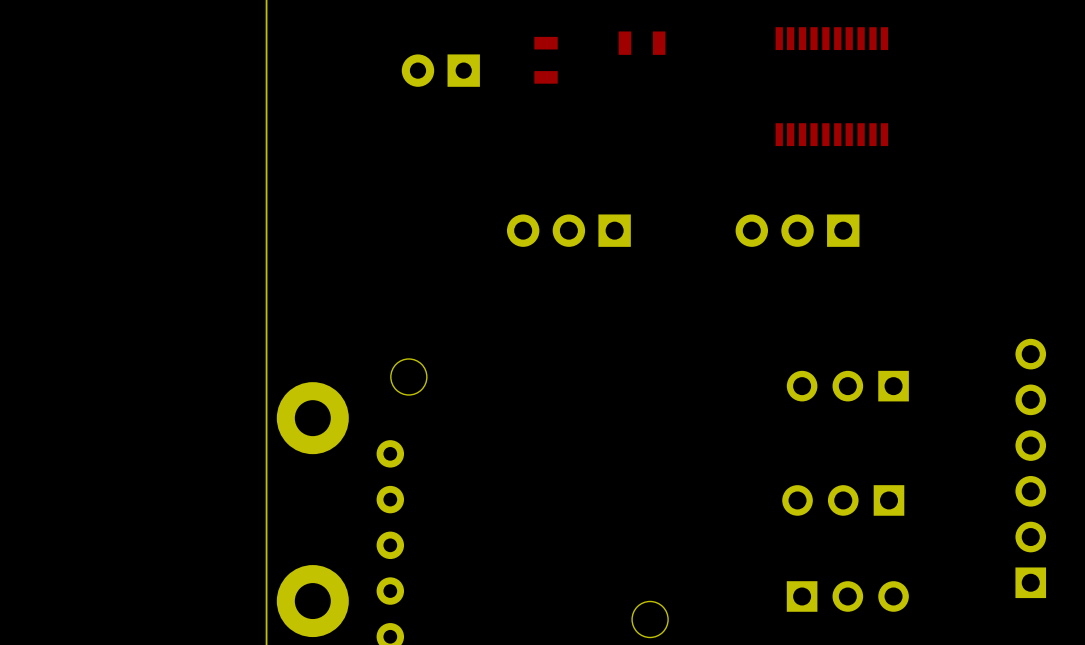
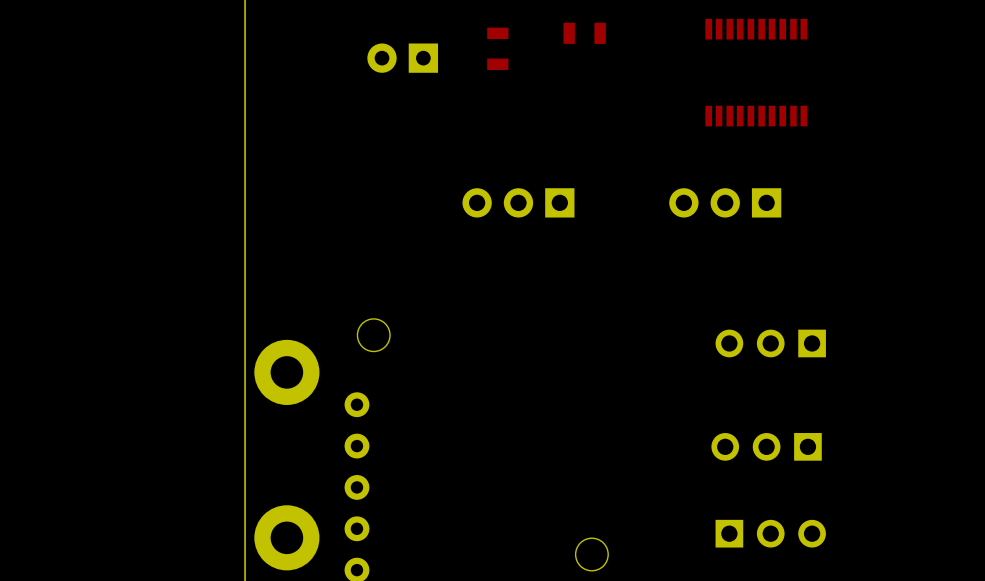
part: (1030, 468) -> none

